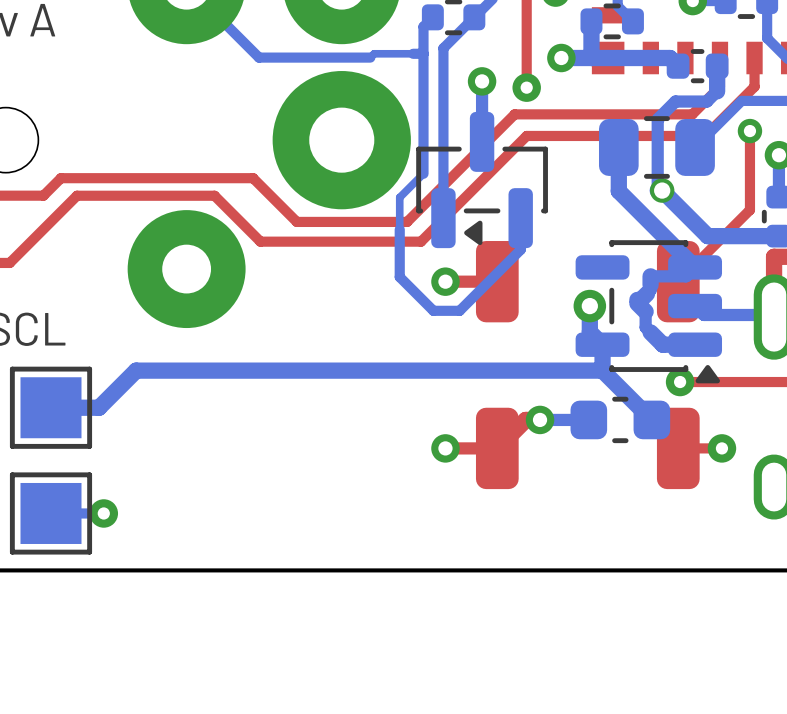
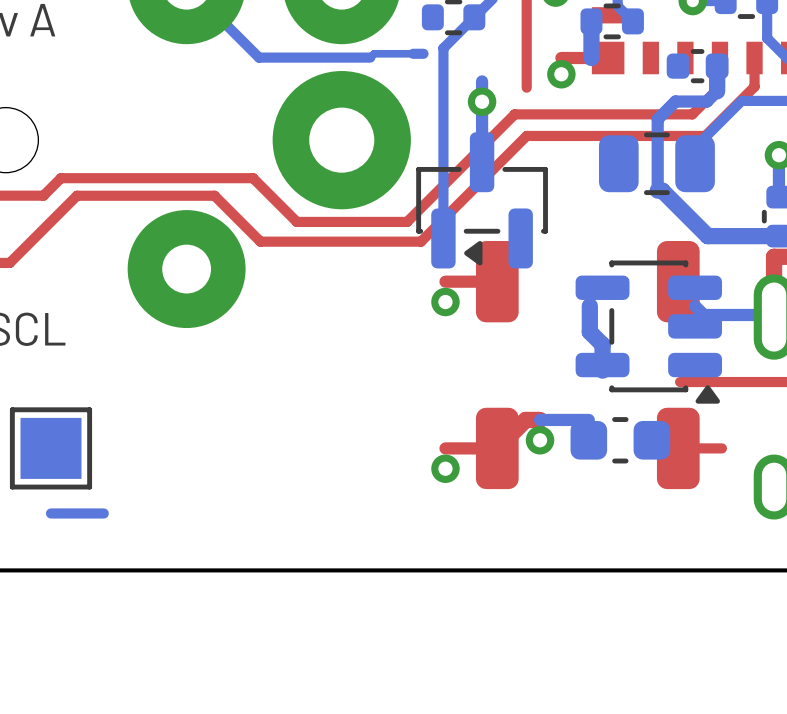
bottom track: (432, 17) (423, 26) (423, 173) (399, 197) (399, 277) (433, 310) (459, 310) (520, 249) (520, 218) -> none
bottom track: (561, 58) (669, 58) (678, 66) -> none
via position: (561, 58) -> (561, 74)
via position: (482, 81) -> (482, 101)
via: (526, 87) -> none
top track: (749, 131) (749, 210) (678, 281) -> none
via: (749, 131) -> none
bottom track: (618, 147) (618, 191) (695, 267) (686, 276) (650, 276) (650, 290) (640, 299) (637, 299) (637, 303) (645, 311) (645, 327) (662, 344) (695, 344) -> none
part position: (656, 147) -> (656, 163)
part position: (482, 180) -> (482, 200)
via: (662, 190) -> none
via position: (445, 281) -> (445, 302)
via: (589, 306) -> none
part position: (648, 311) -> (648, 332)
via: (680, 382) -> none
bottom track: (50, 407) (99, 407) (136, 370) (602, 370) (651, 419) -> none
part: (50, 407) -> none
via position: (540, 419) -> (540, 440)
part position: (620, 419) -> (620, 440)
part: none -> (50, 448)
via position: (445, 448) -> (445, 468)
via: (721, 448) -> none
part: (50, 513) -> none
via: (103, 513) -> none

